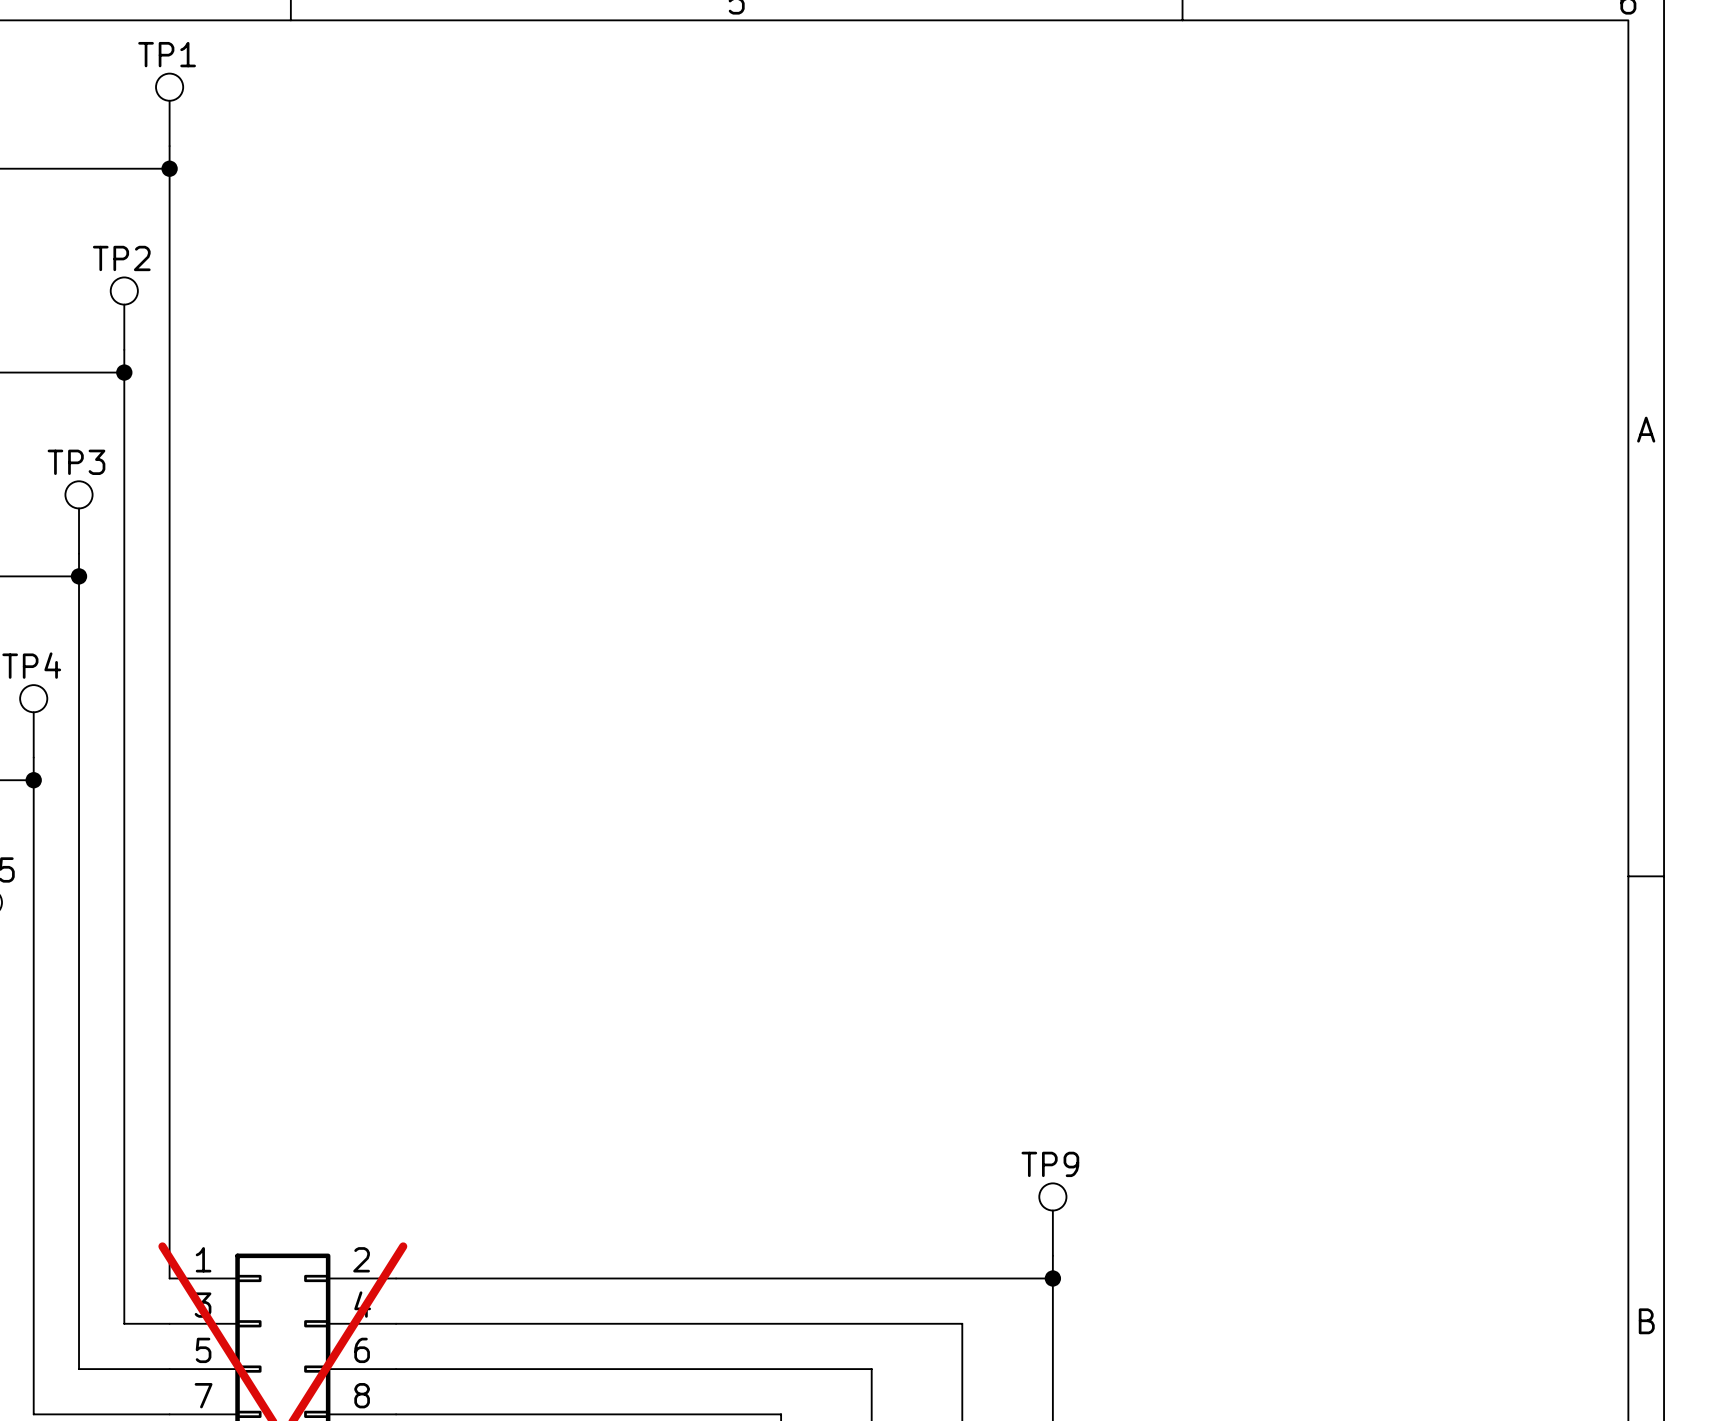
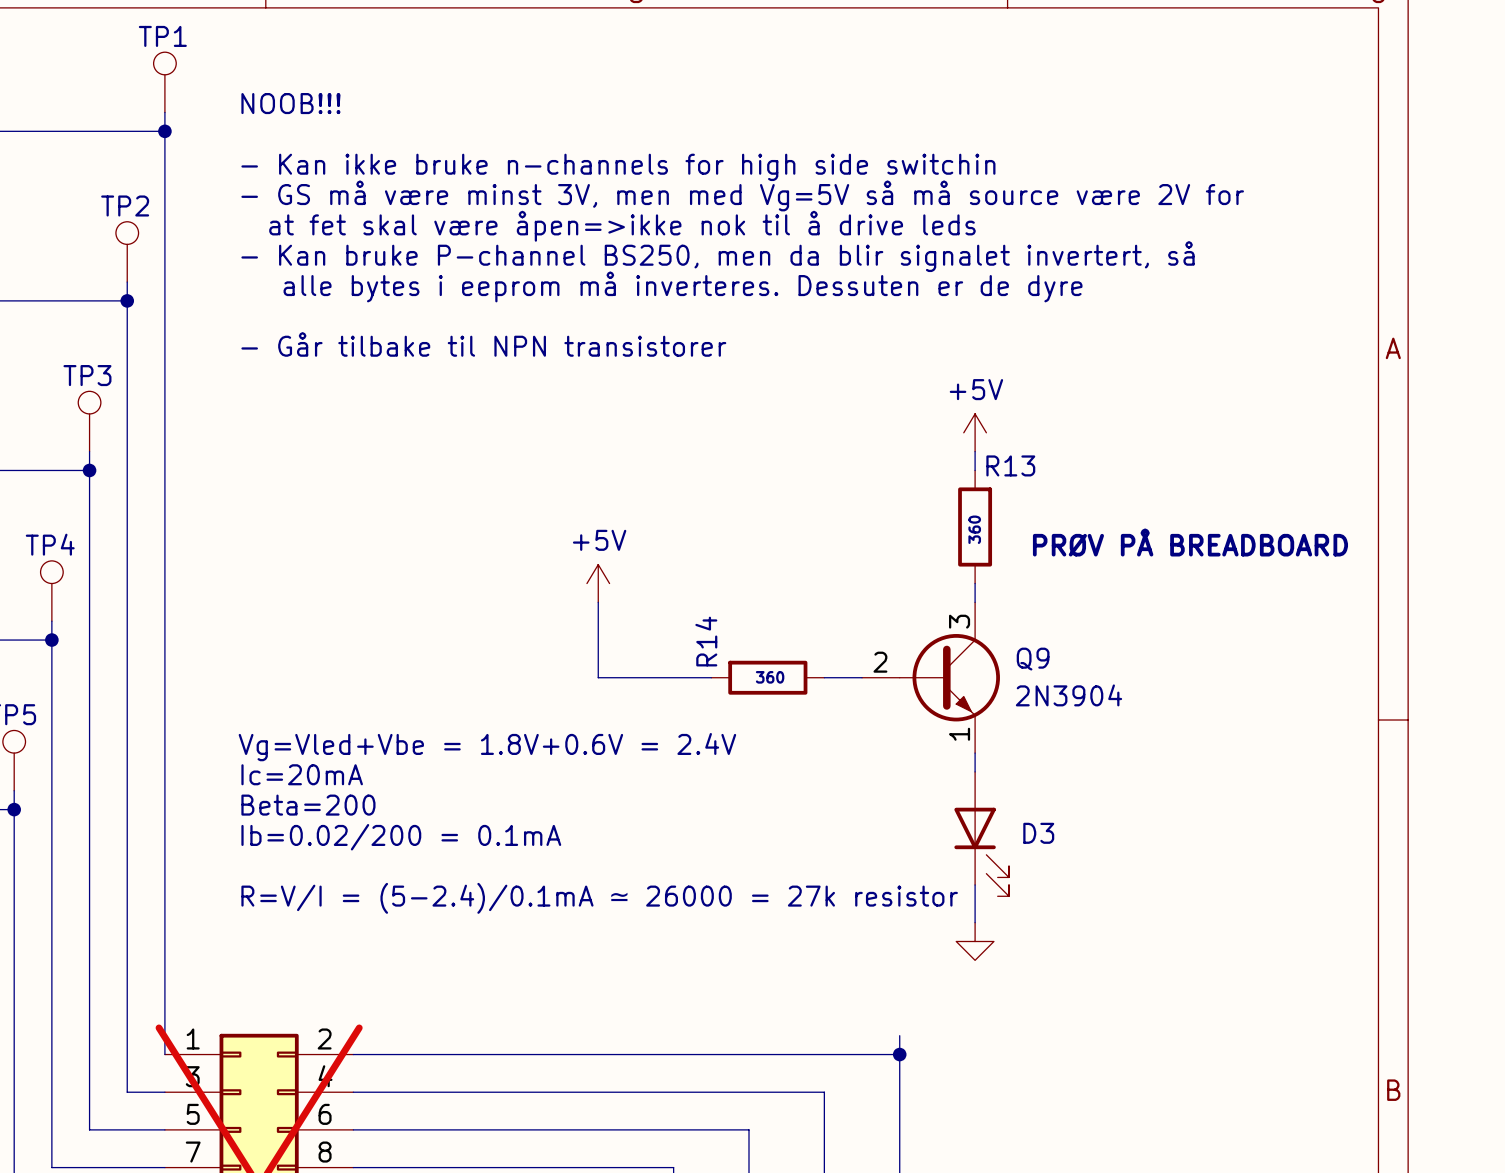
text: none -> NOOB!!! (290, 103)
text: none -> - Kan ikke bruke n-channels for high side switchin (618, 167)
text: none -> - GS må være minst 3V, men med Vg=5V så må source være 2V for (742, 195)
text: none -> at fet skal være åpen=>ikke nok til å drive leds (622, 226)
text: none -> - Kan bruke P-channel BS250, men da blir signalet invertert, så (718, 256)
text: none -> alle bytes i eeprom må inverteres. Dessuten er de dyre (683, 286)
text: none -> - Går tilbake til NPN transistorer (483, 344)
power symbol: none -> +5V (975, 432)
wire: none -> (975, 451) (975, 470)
R13: none -> 360 (975, 526)
text: none -> PRØV PÅ BREADBOARD (1190, 542)
power symbol: none -> +5V (598, 583)
wire: none -> (975, 583) (975, 602)
wire: none -> (598, 602) (598, 677) (711, 677)
R14: none -> 360 (767, 677)
wire: none -> (824, 677) (862, 677)
Q9: none -> 2N3904 (931, 677)
text: none -> Vg=Vled+Vbe = 1.8V+0.6V = 2.4V (487, 747)
wire: none -> (975, 753) (975, 771)
text: none -> Ic=20mA (302, 774)
text: none -> Beta=200 (308, 805)
D3: none -> (981, 834)
text: none -> Ib=0.02/200 = 0.1mA (401, 837)
wire: none -> (975, 884) (975, 922)
text: none -> R=V/I = (5-2.4)/0.1mA ≃ 26000 = 27k resistor (599, 898)
power symbol: none -> (975, 941)
TP9: (1052, 1219) -> none

